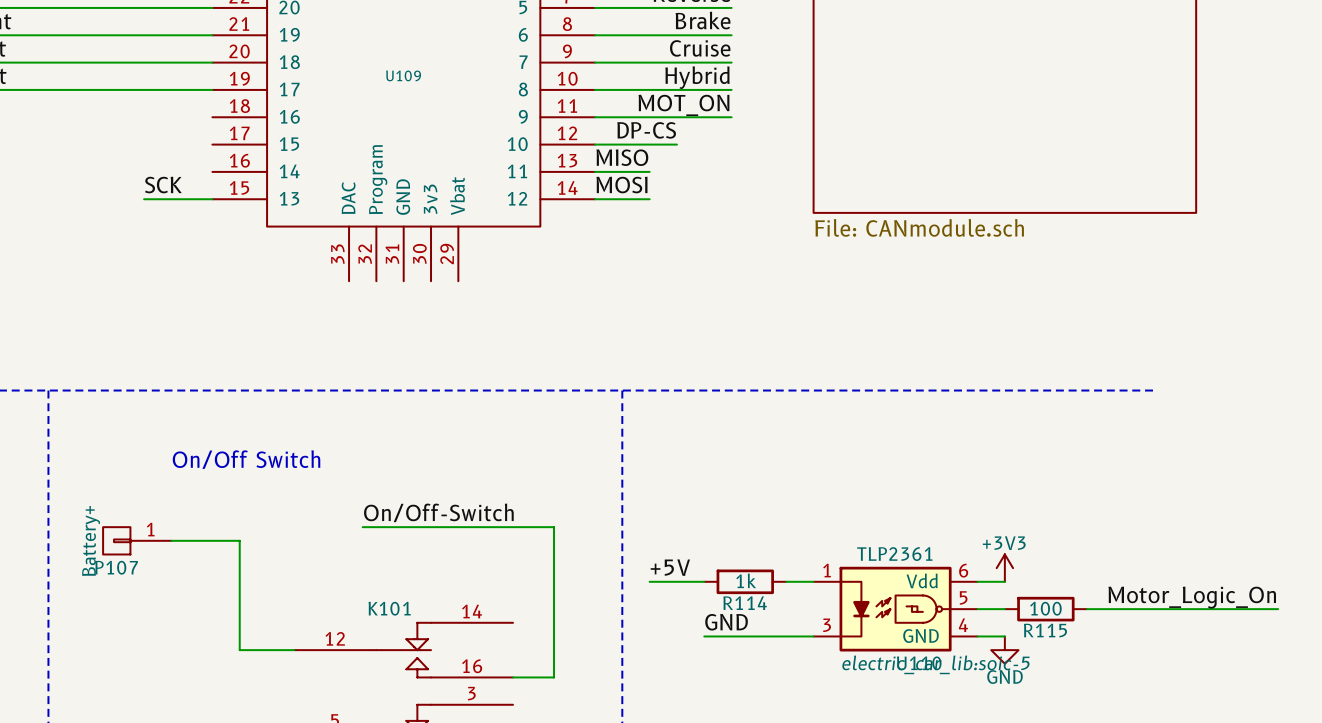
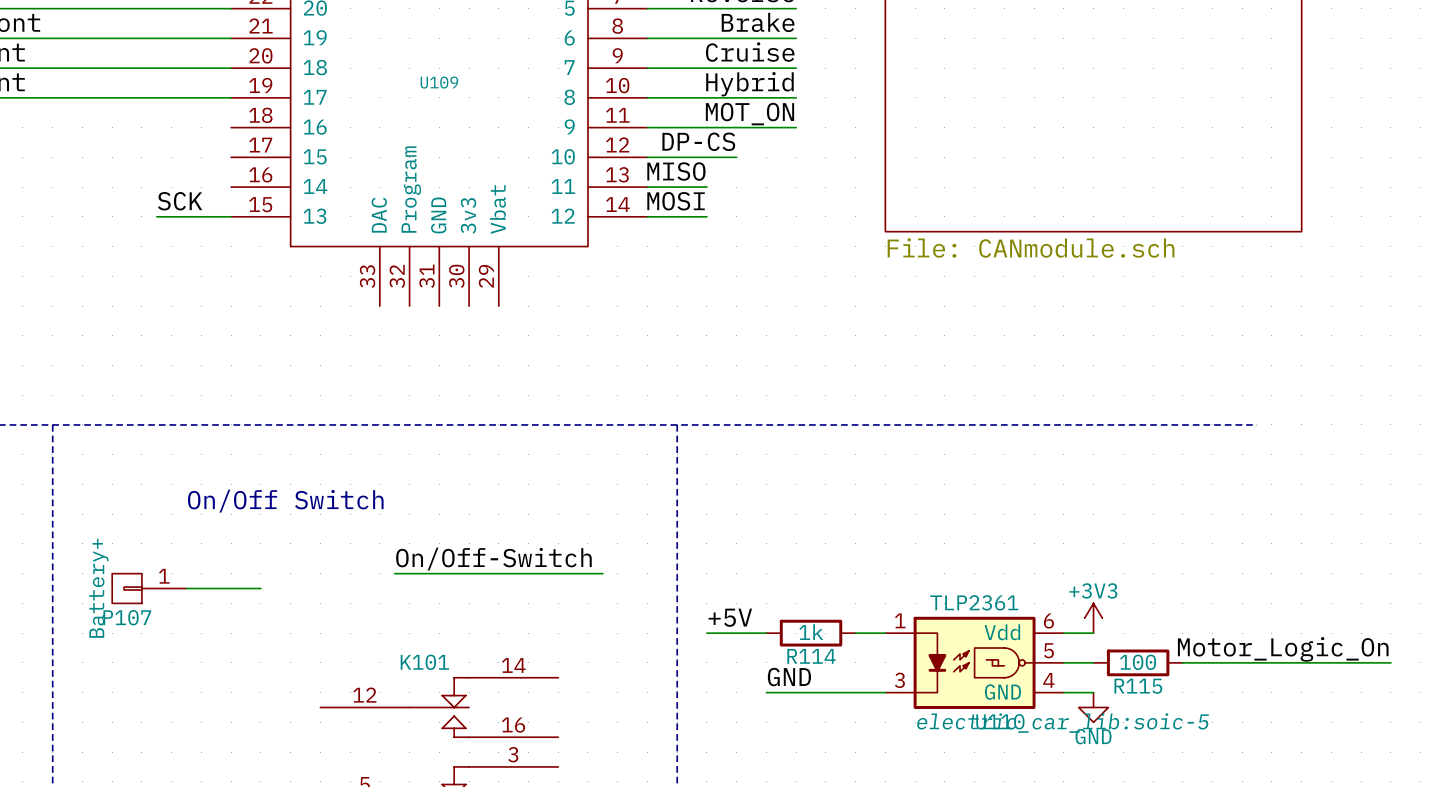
wire: (553, 527) (553, 677) (513, 677) -> none
wire: (239, 540) (239, 650) (294, 650) -> none

